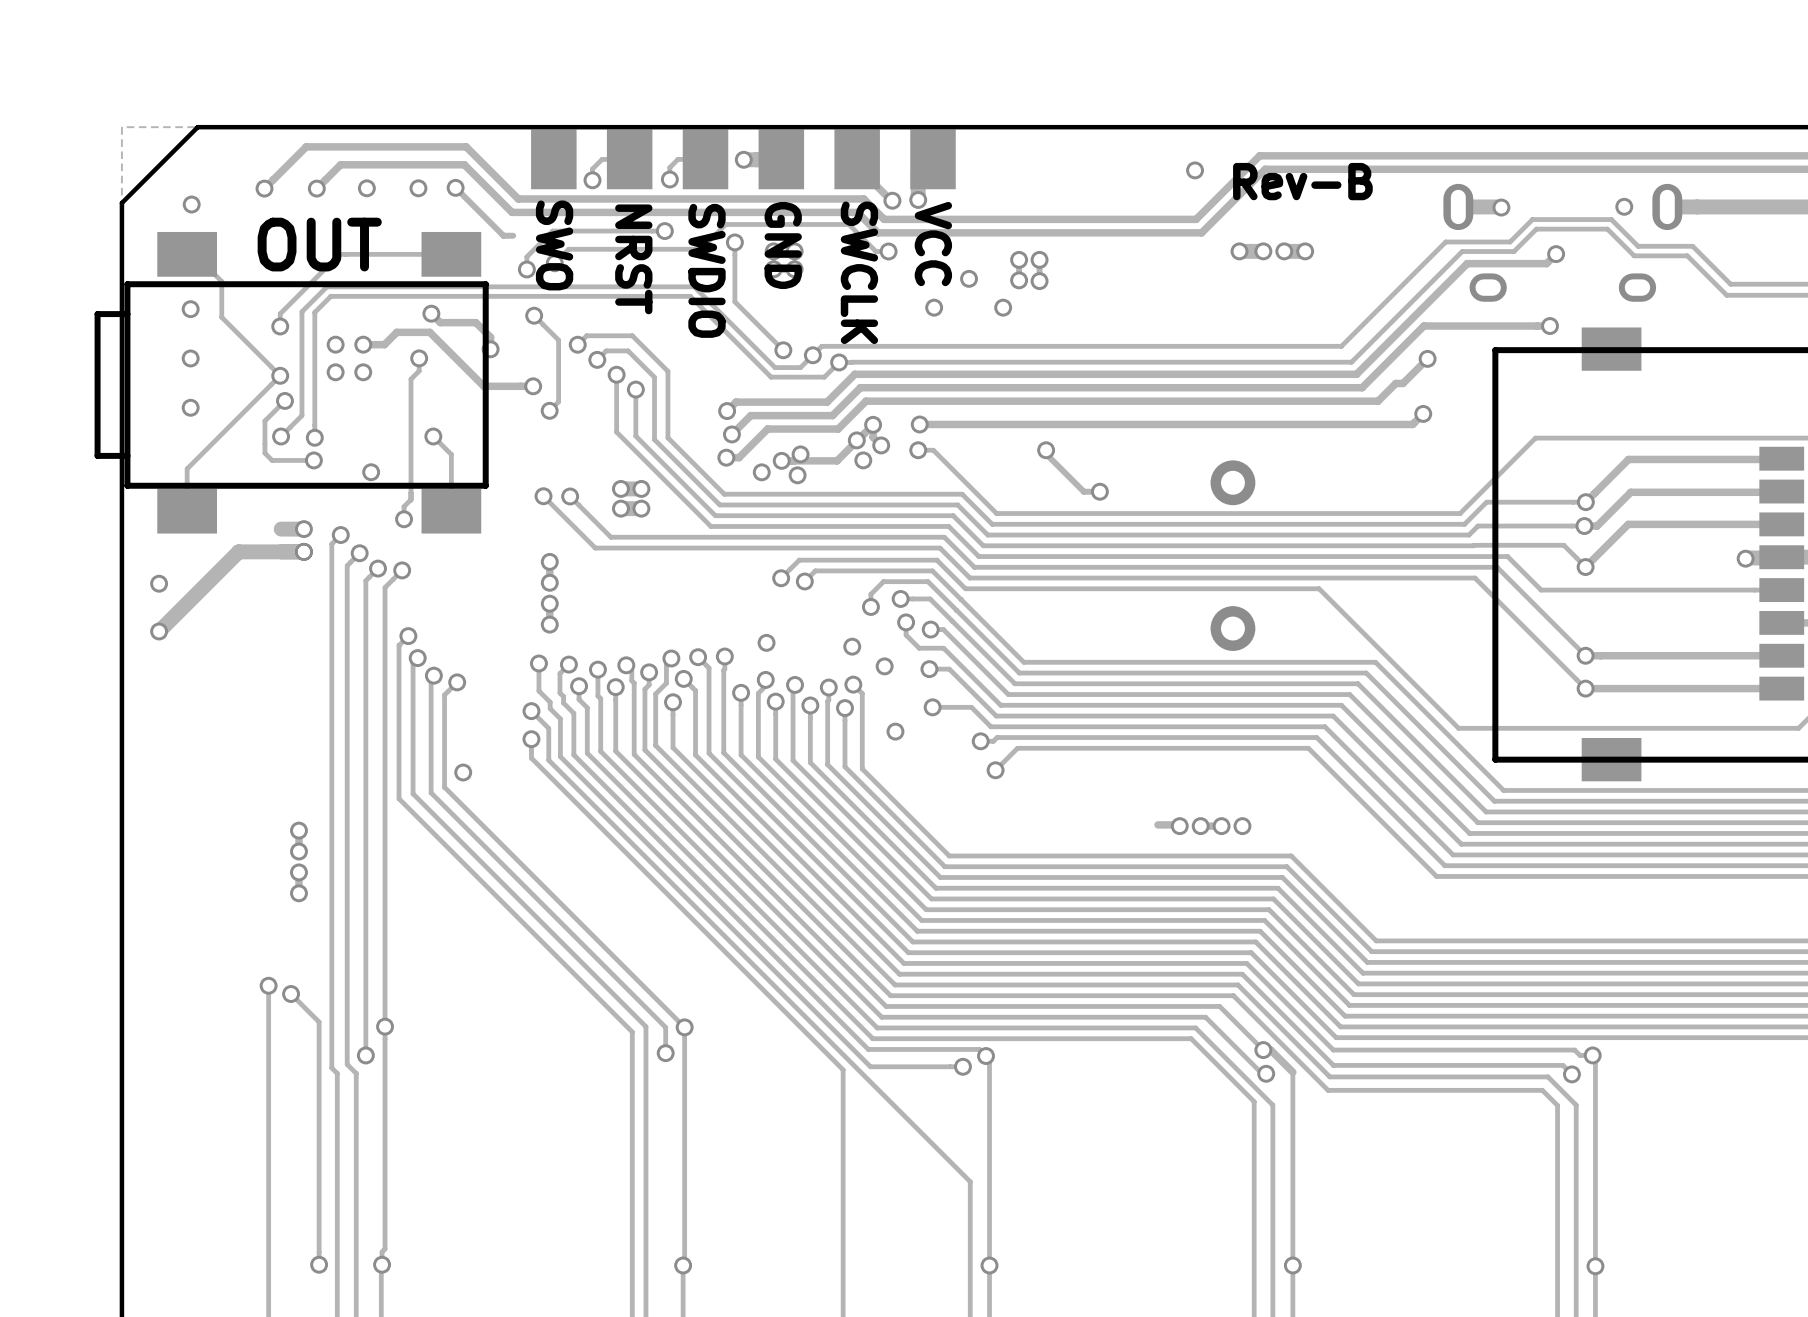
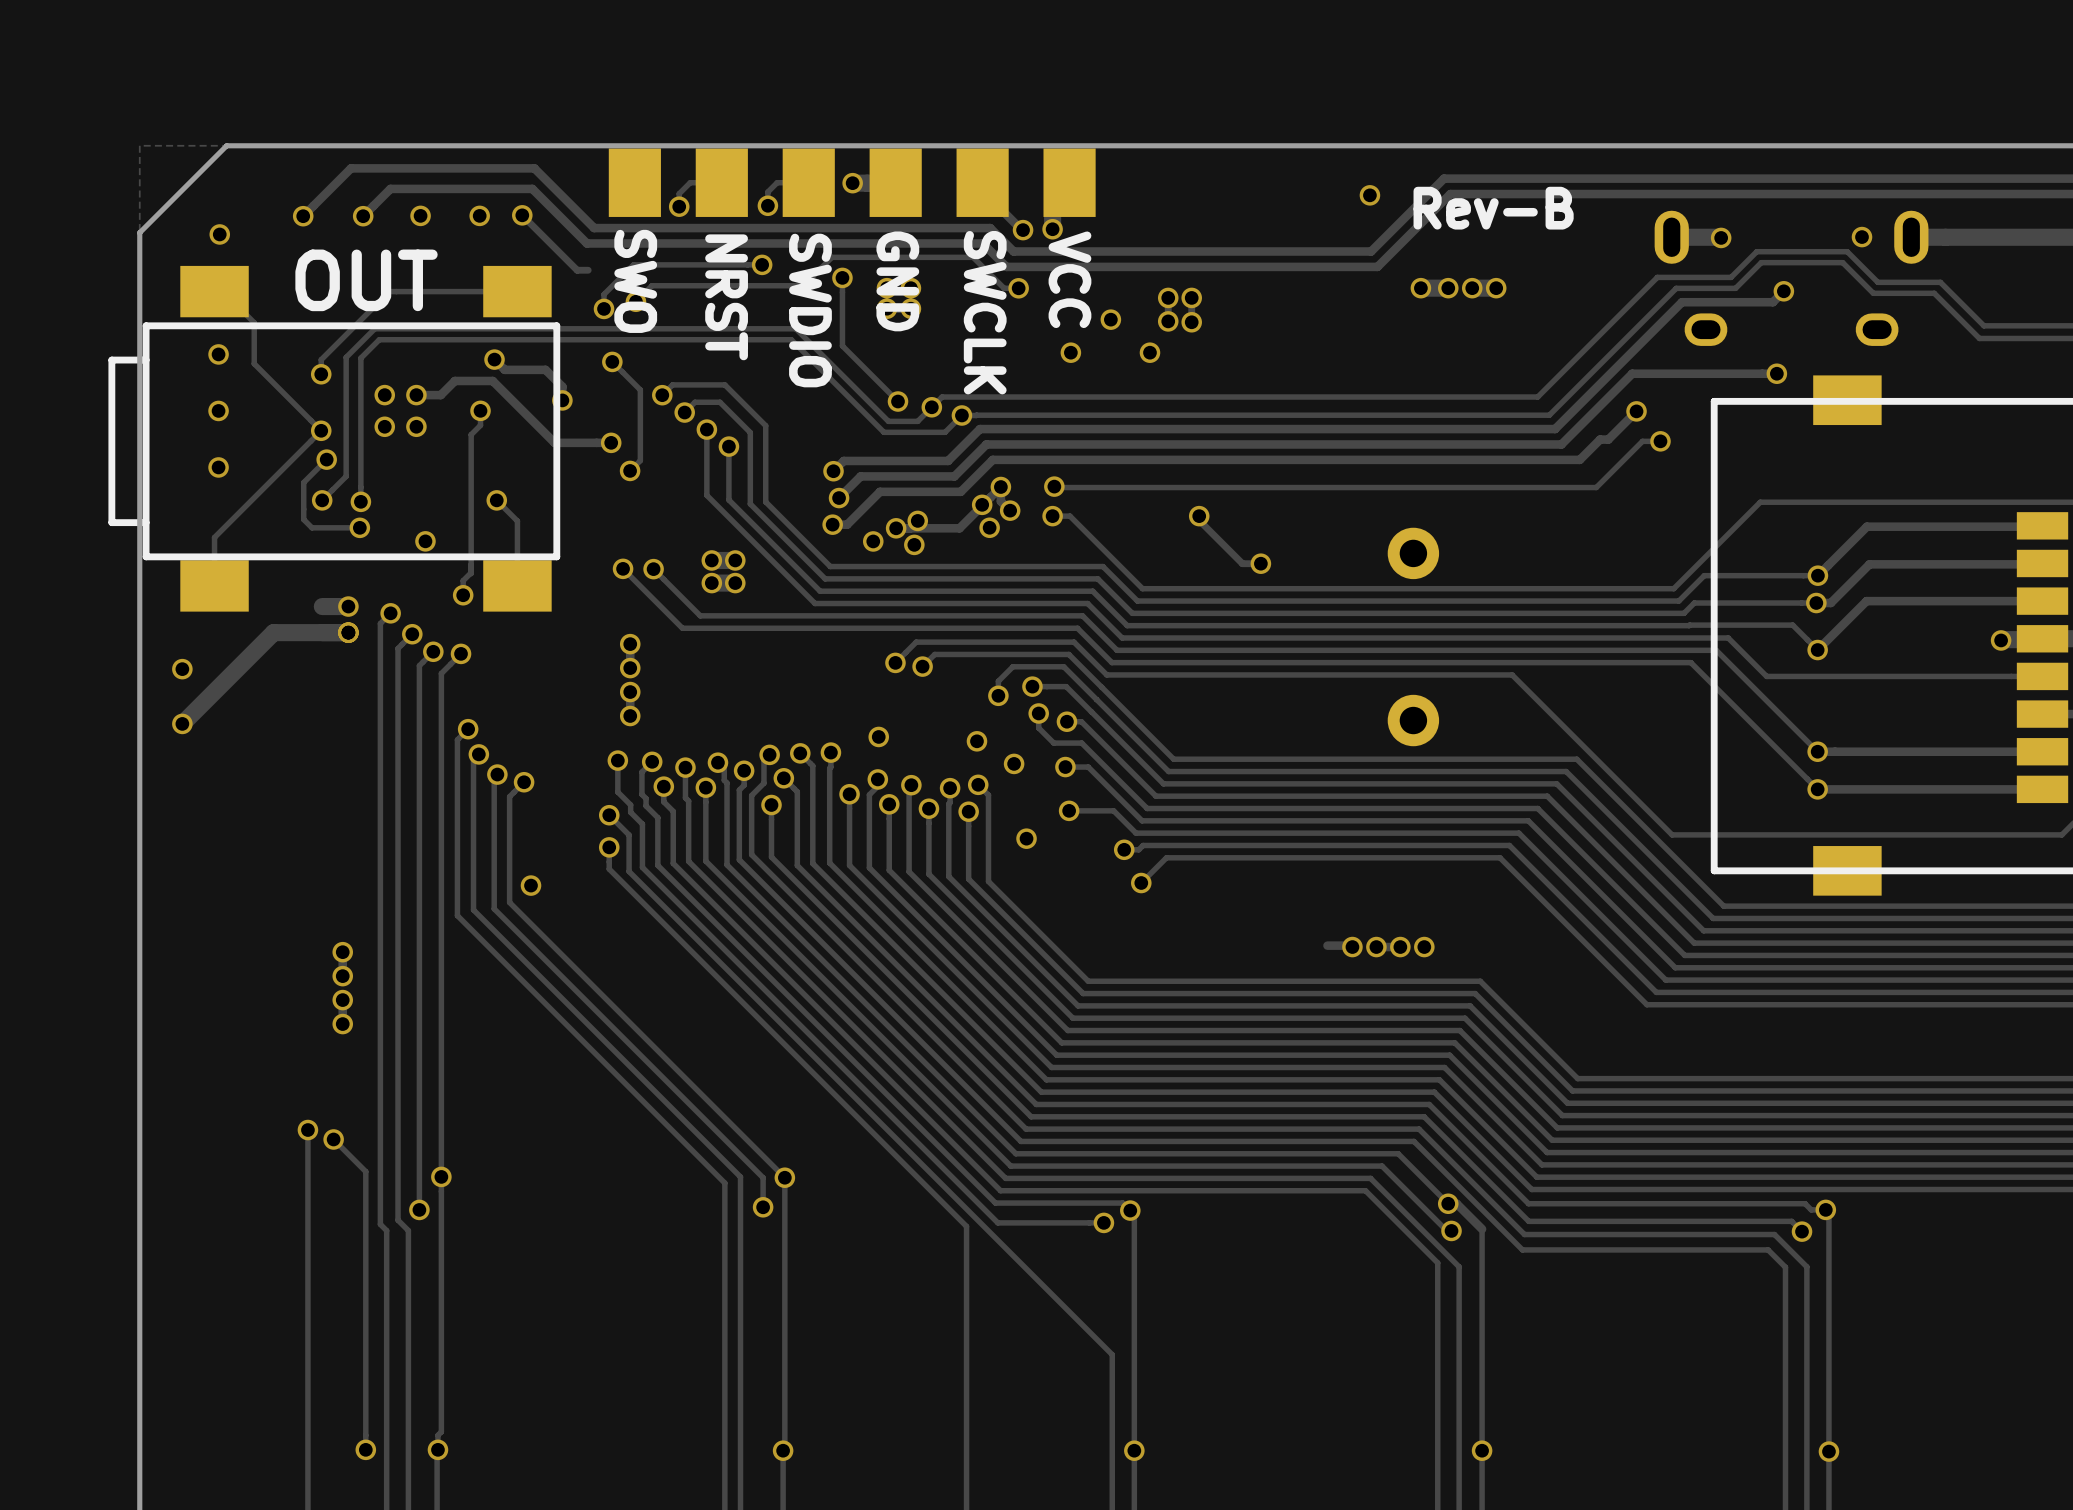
track: none -> (1660, 441) (1642, 441) (1596, 487) (1052, 487)
track: (1423, 413) (1412, 424) (919, 424) -> none
via position: (1423, 413) -> (1660, 441)

